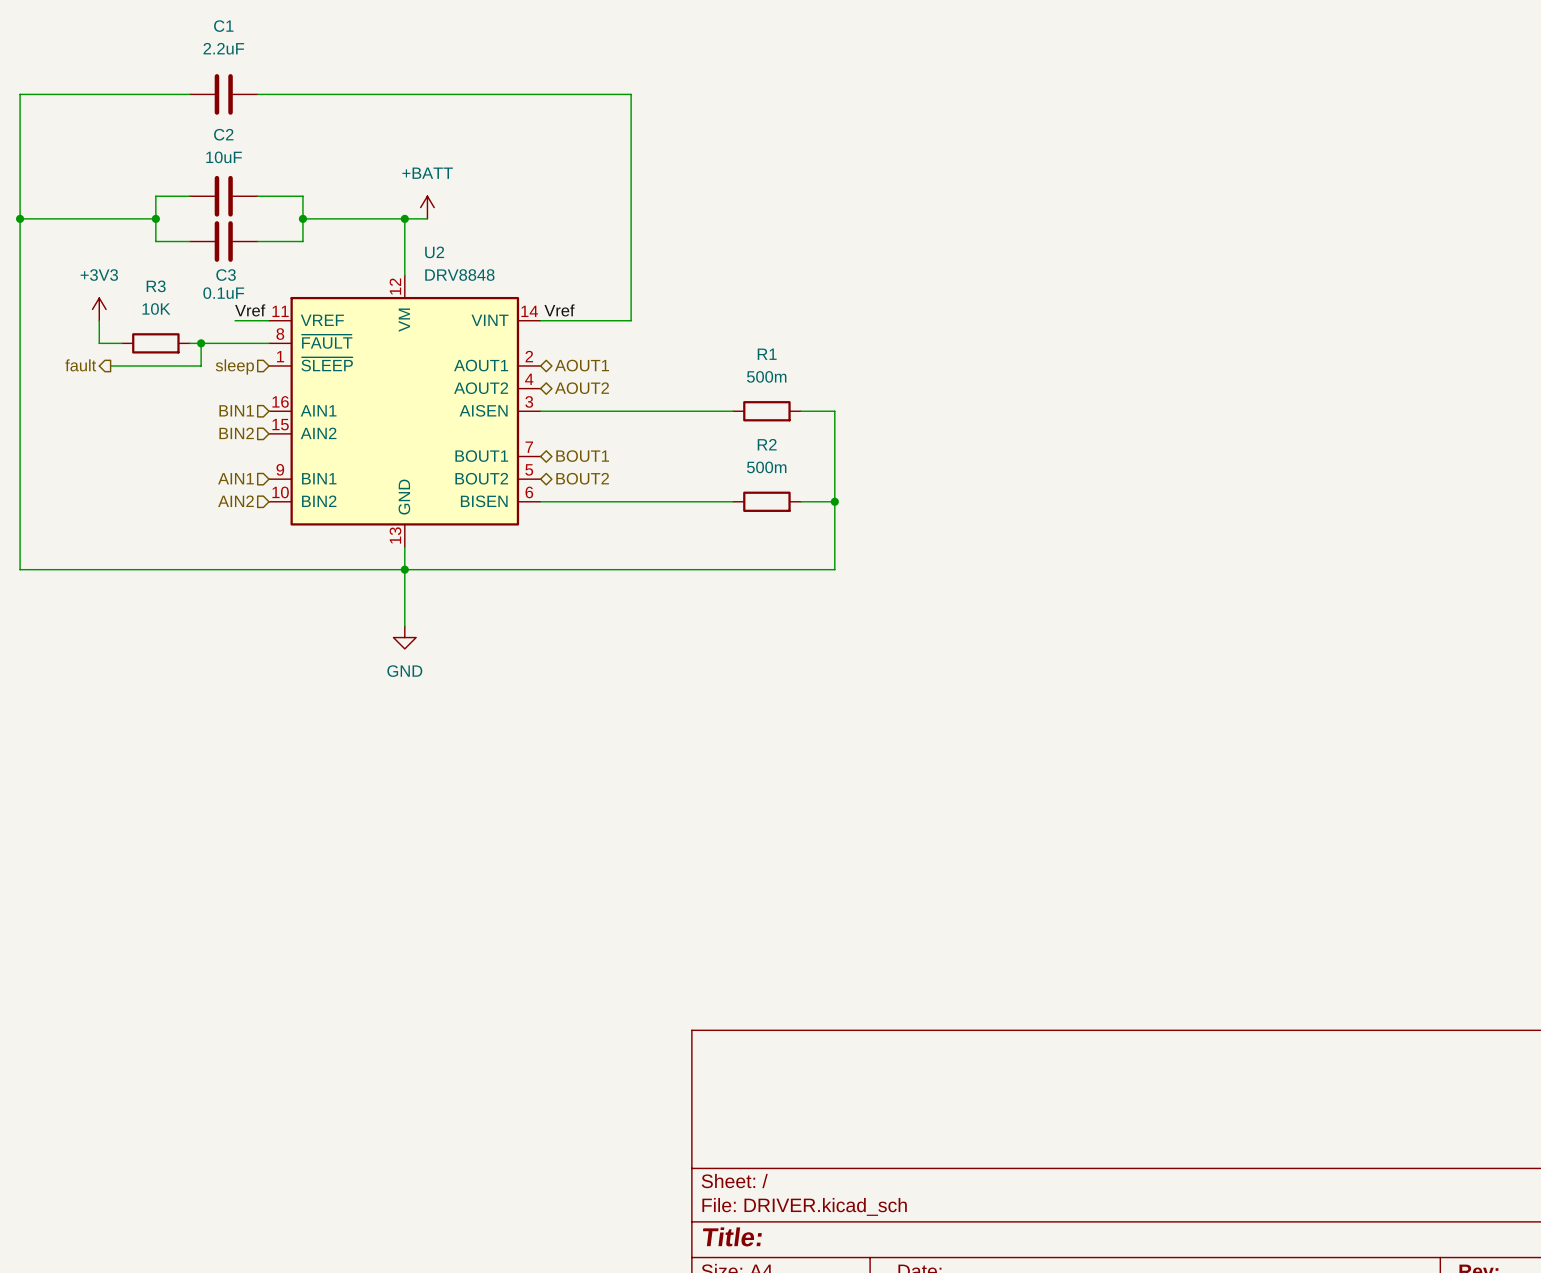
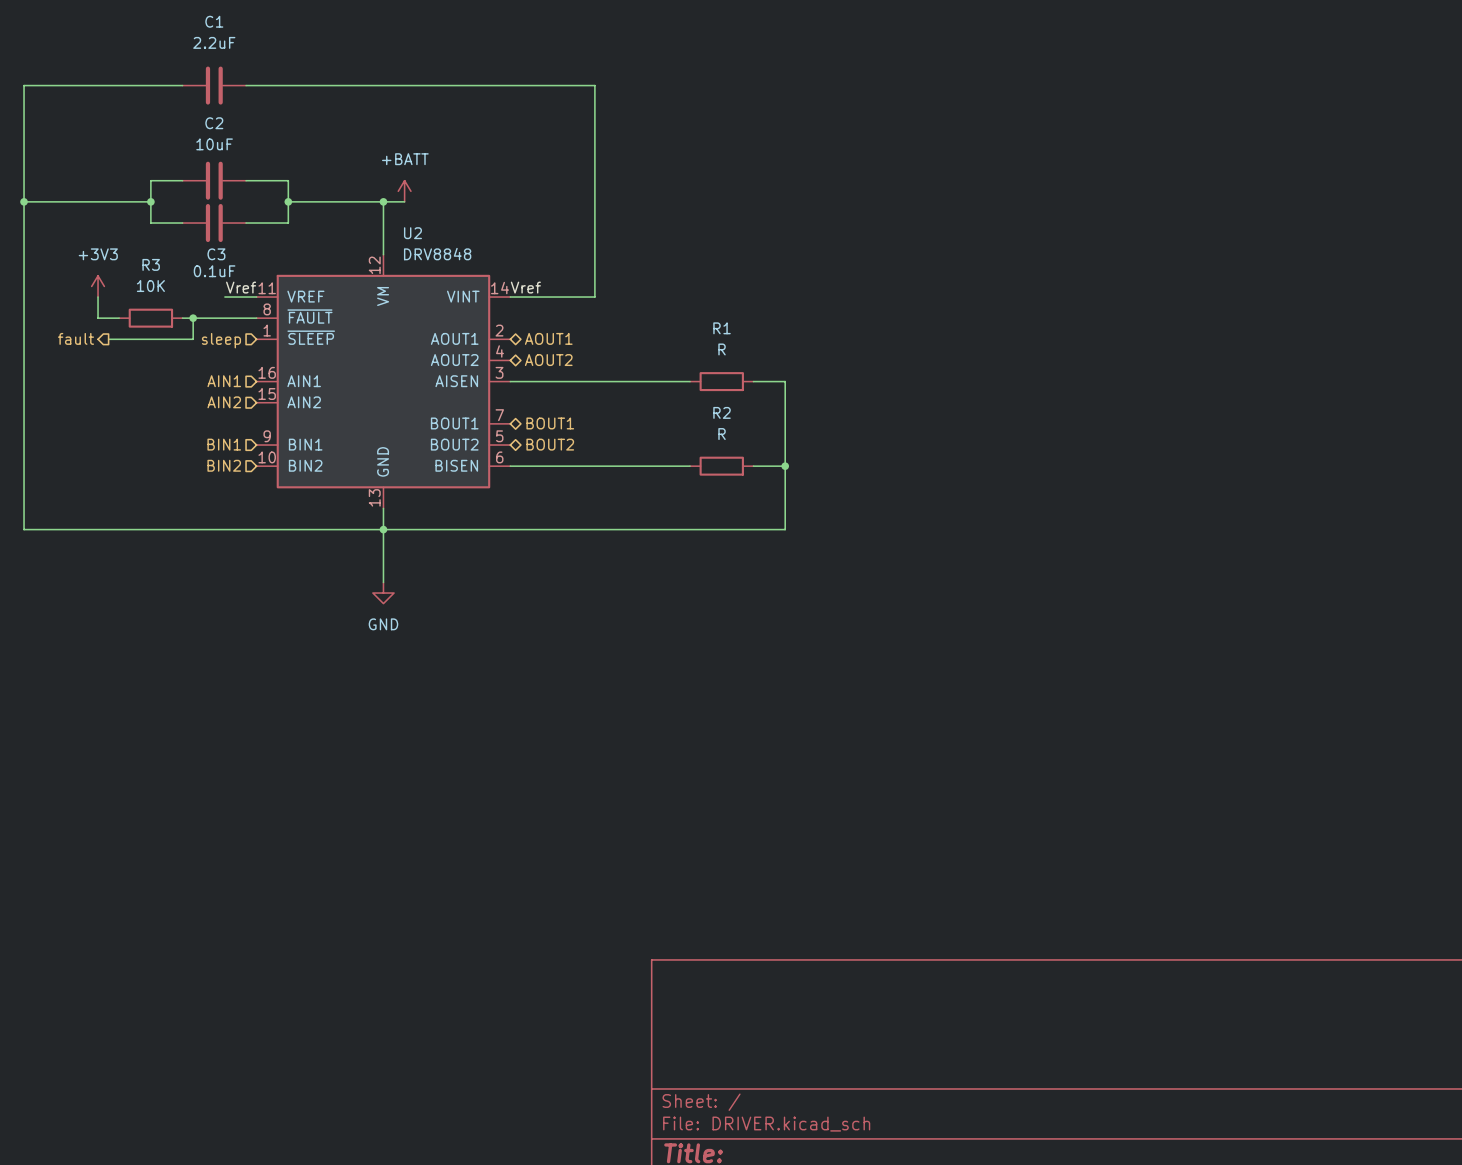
R1 value: 500m (766, 376) -> R (722, 349)
hierarchical label: BIN1 (236, 410) -> AIN1 (224, 381)
hierarchical label: BIN2 (236, 433) -> AIN2 (224, 402)
R2 value: 500m (766, 467) -> R (722, 434)
hierarchical label: AIN1 (235, 478) -> BIN1 (224, 444)
hierarchical label: AIN2 (235, 501) -> BIN2 (224, 465)

